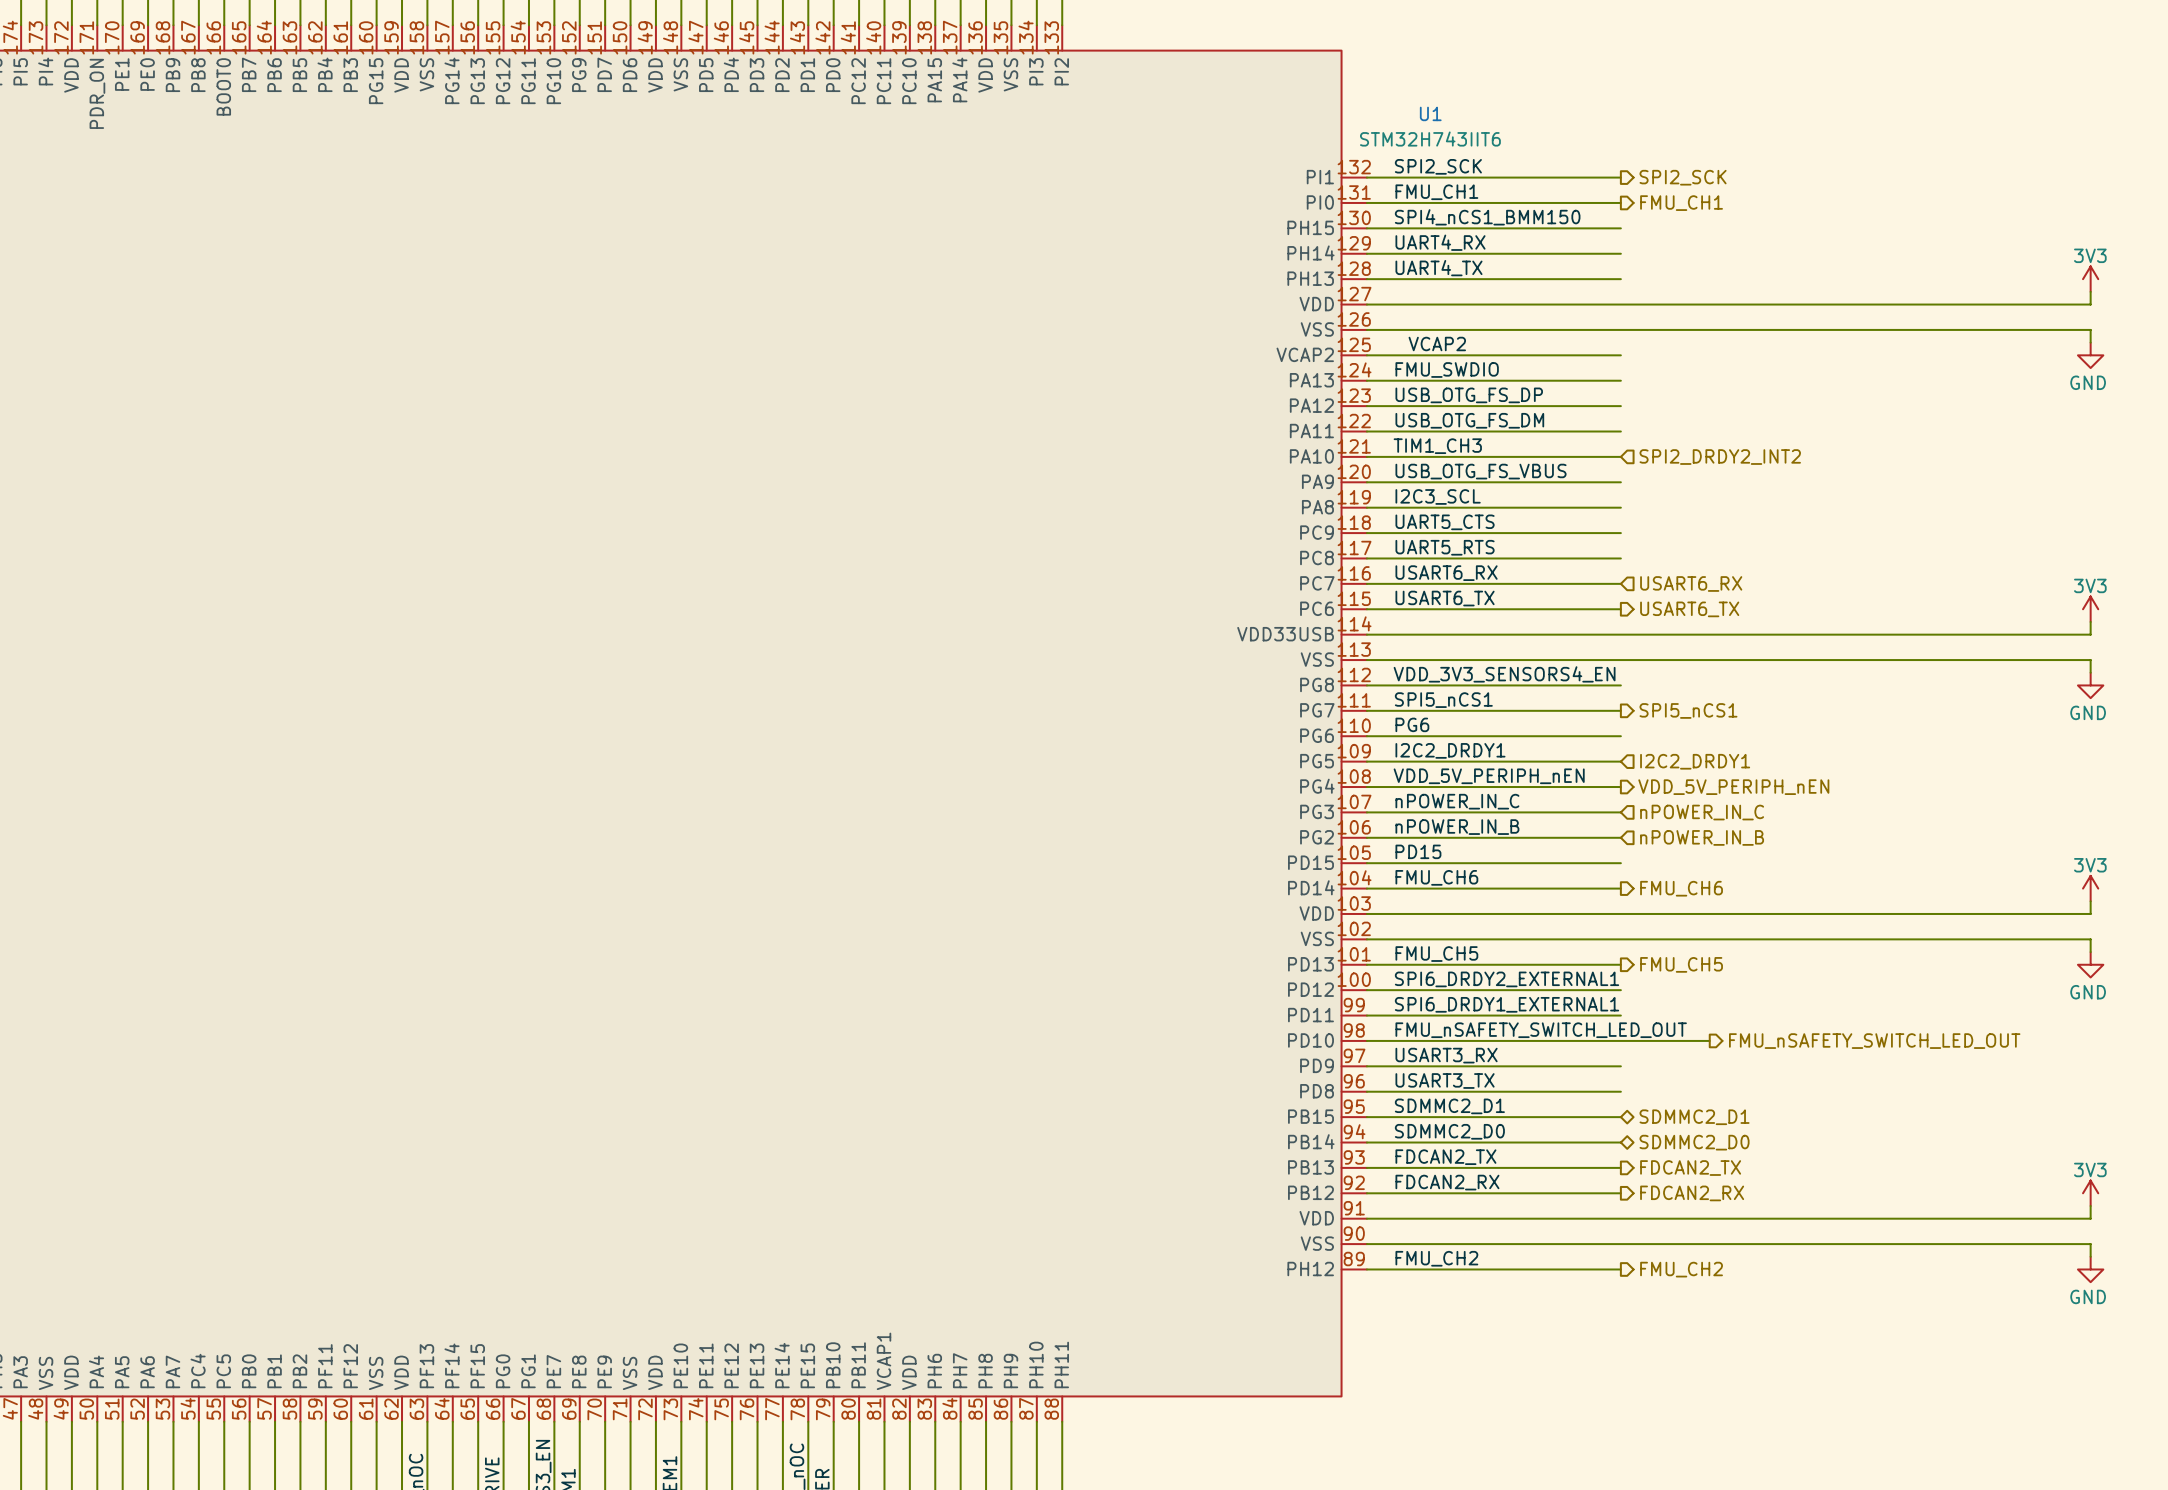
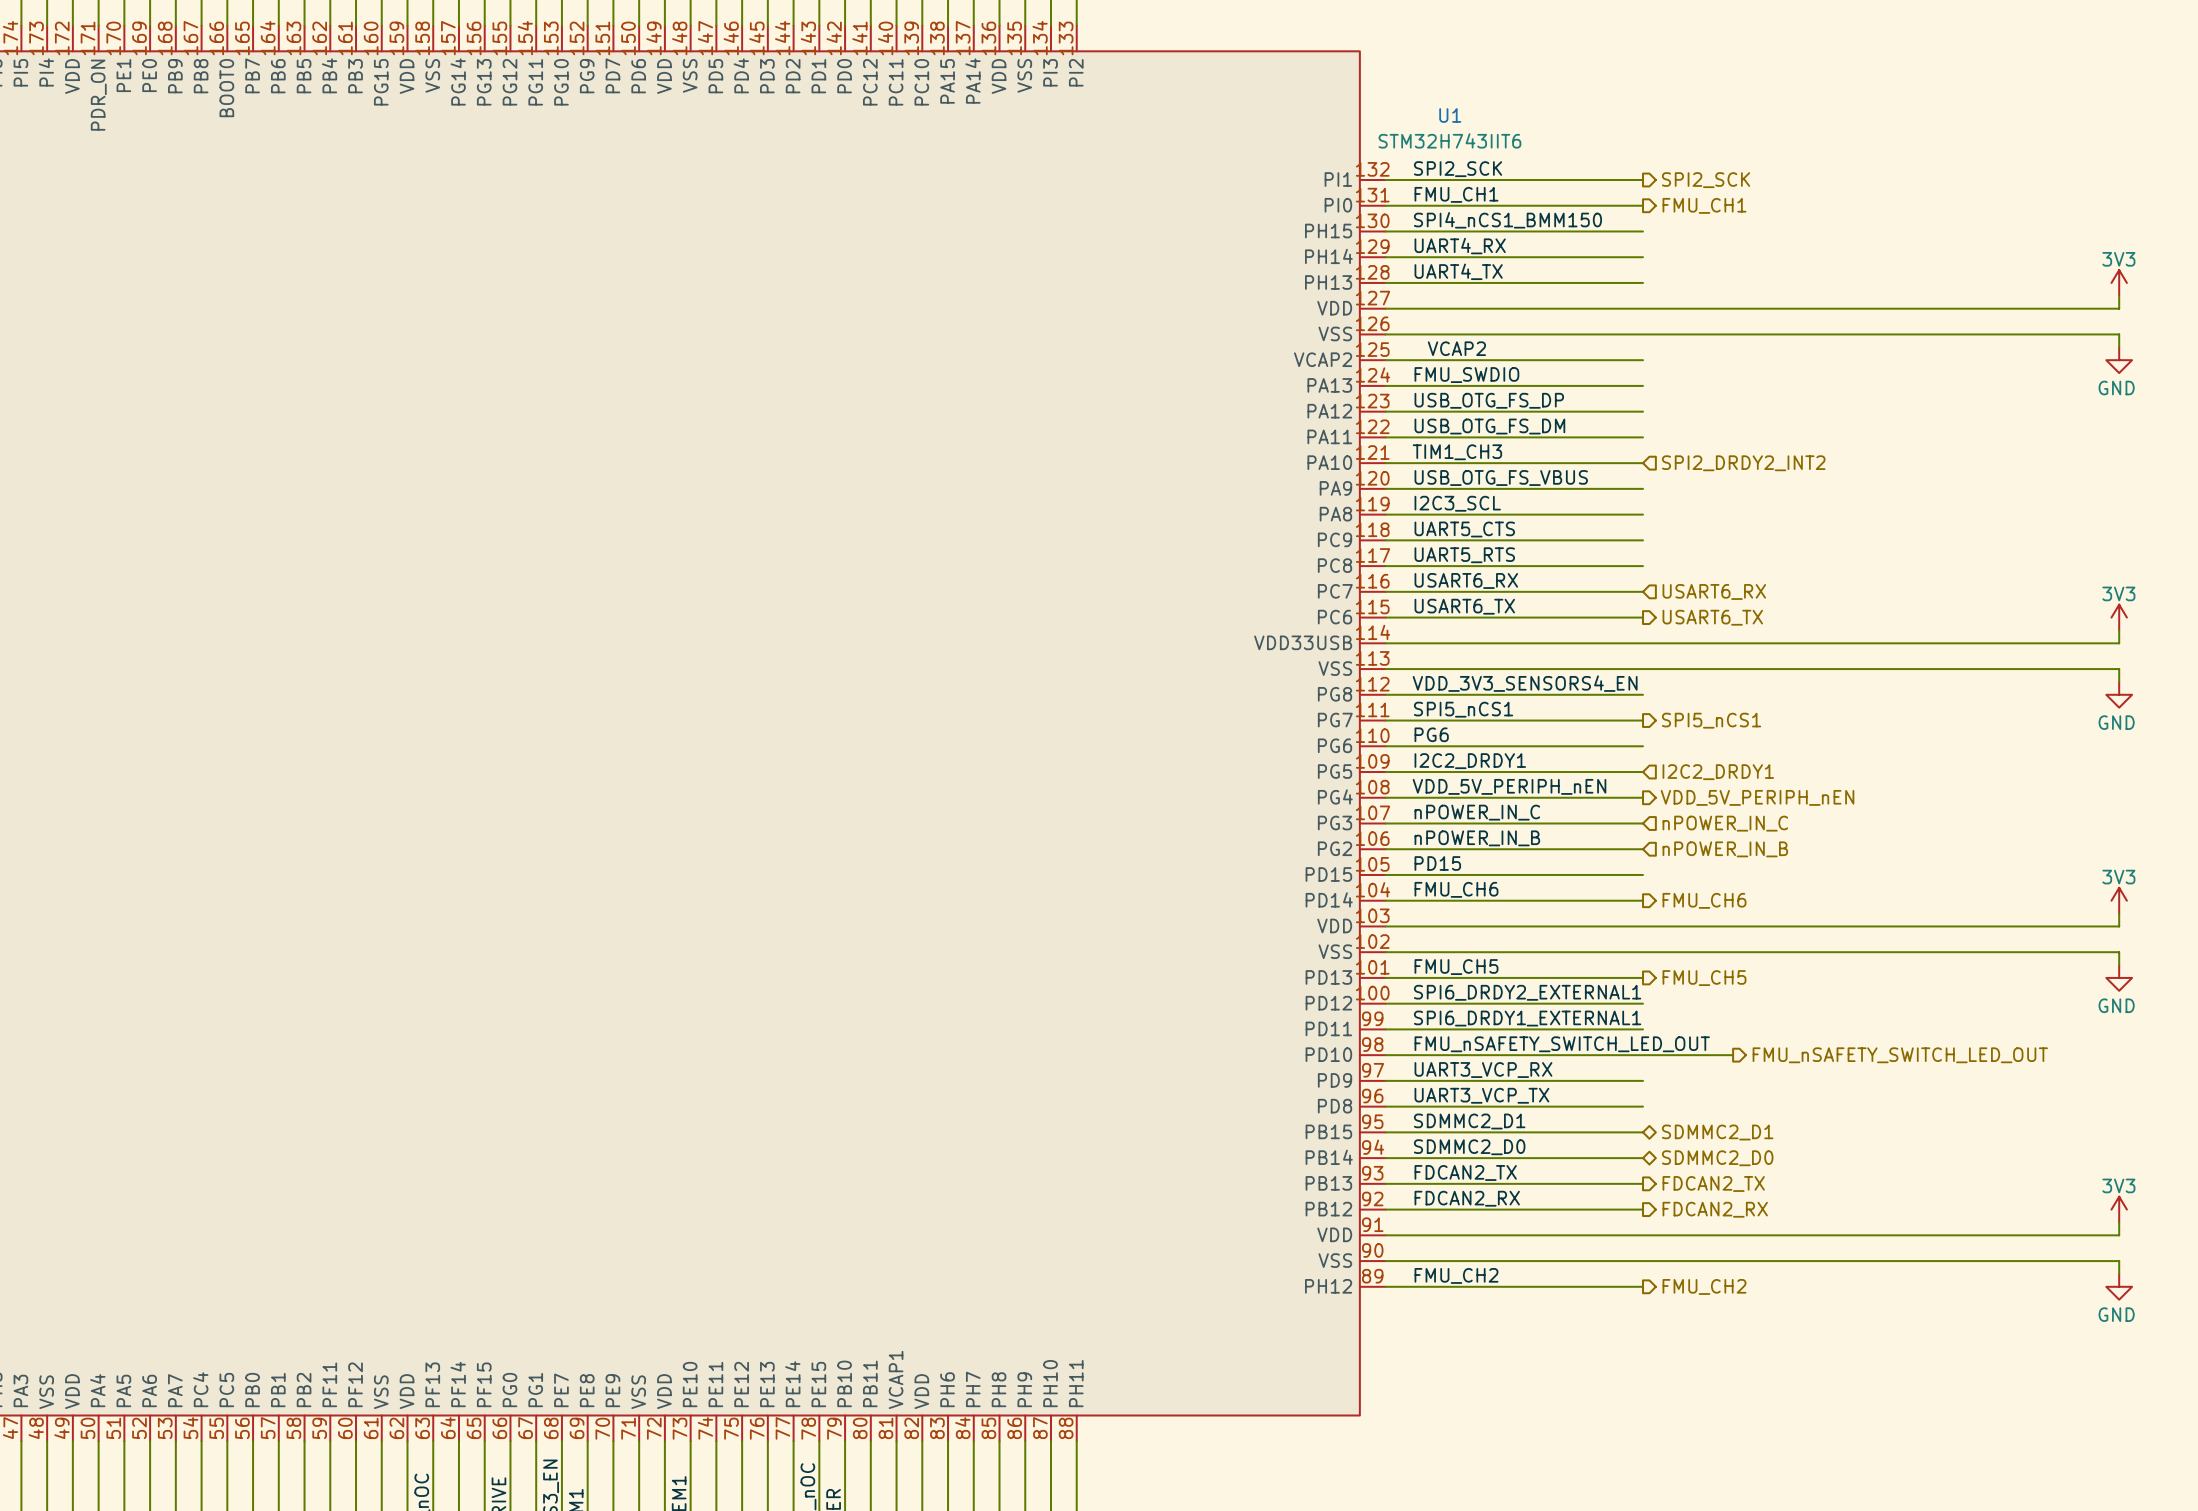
label: USART3_RX (1446, 1055) -> UART3_VCP_RX (1483, 1070)
label: USART3_TX (1445, 1081) -> UART3_VCP_TX (1481, 1095)

